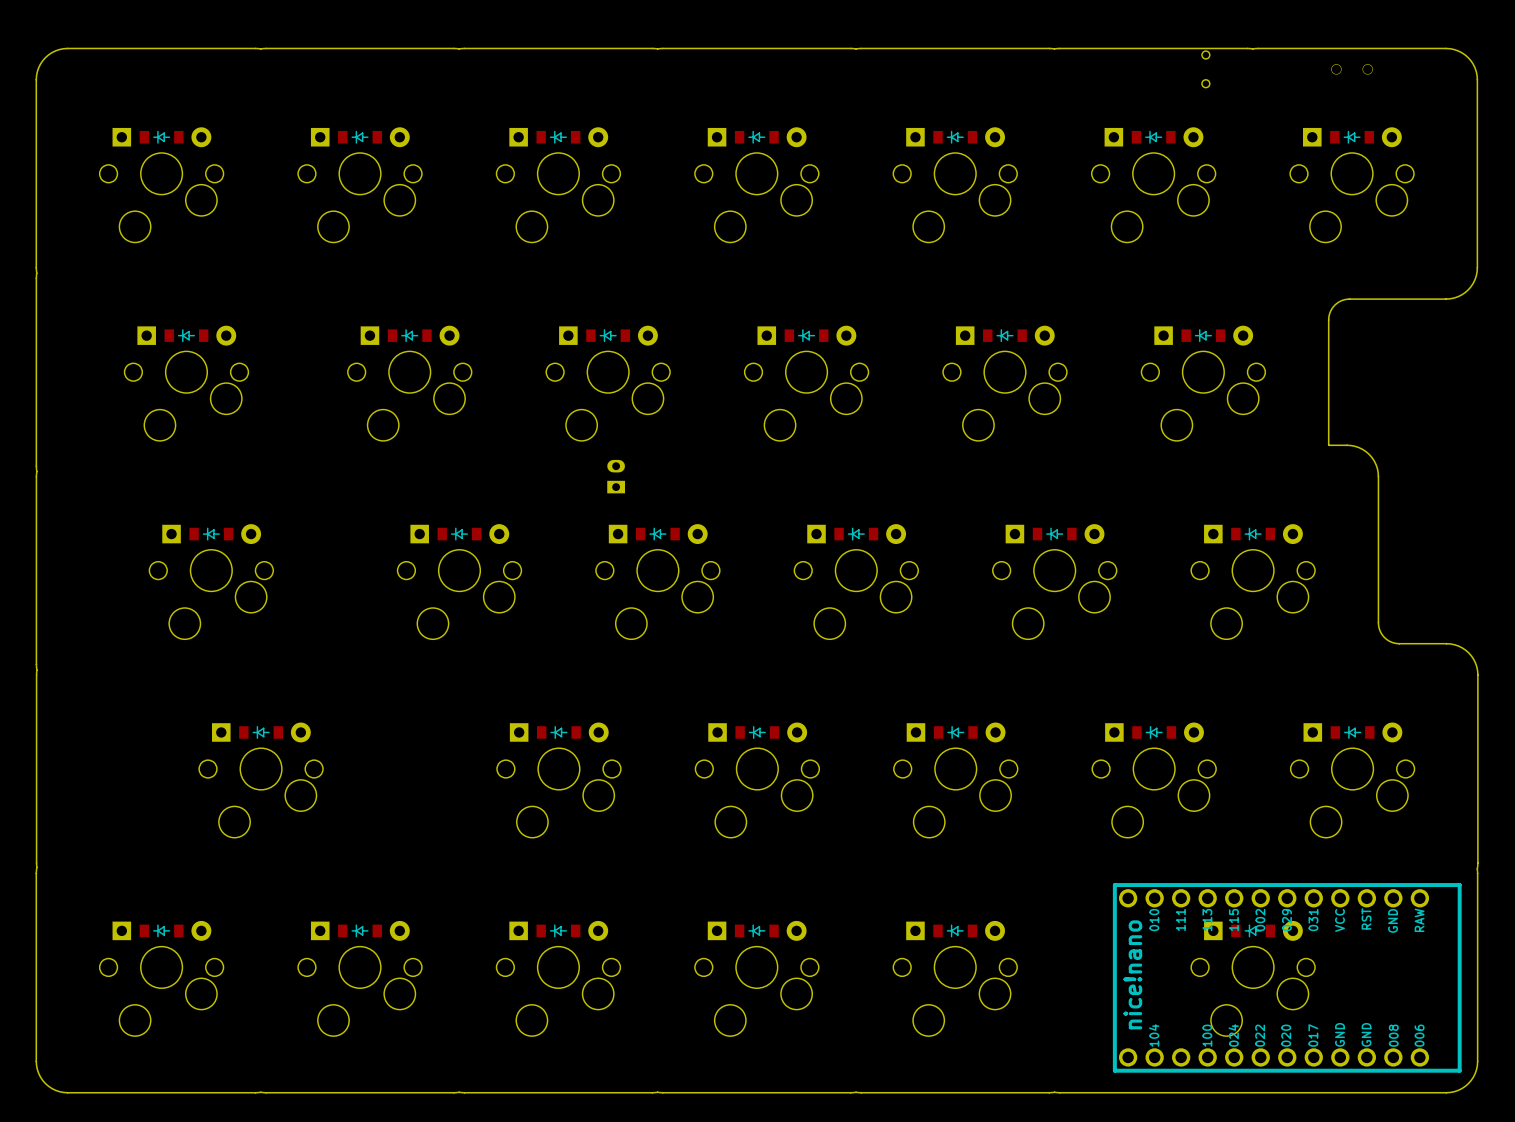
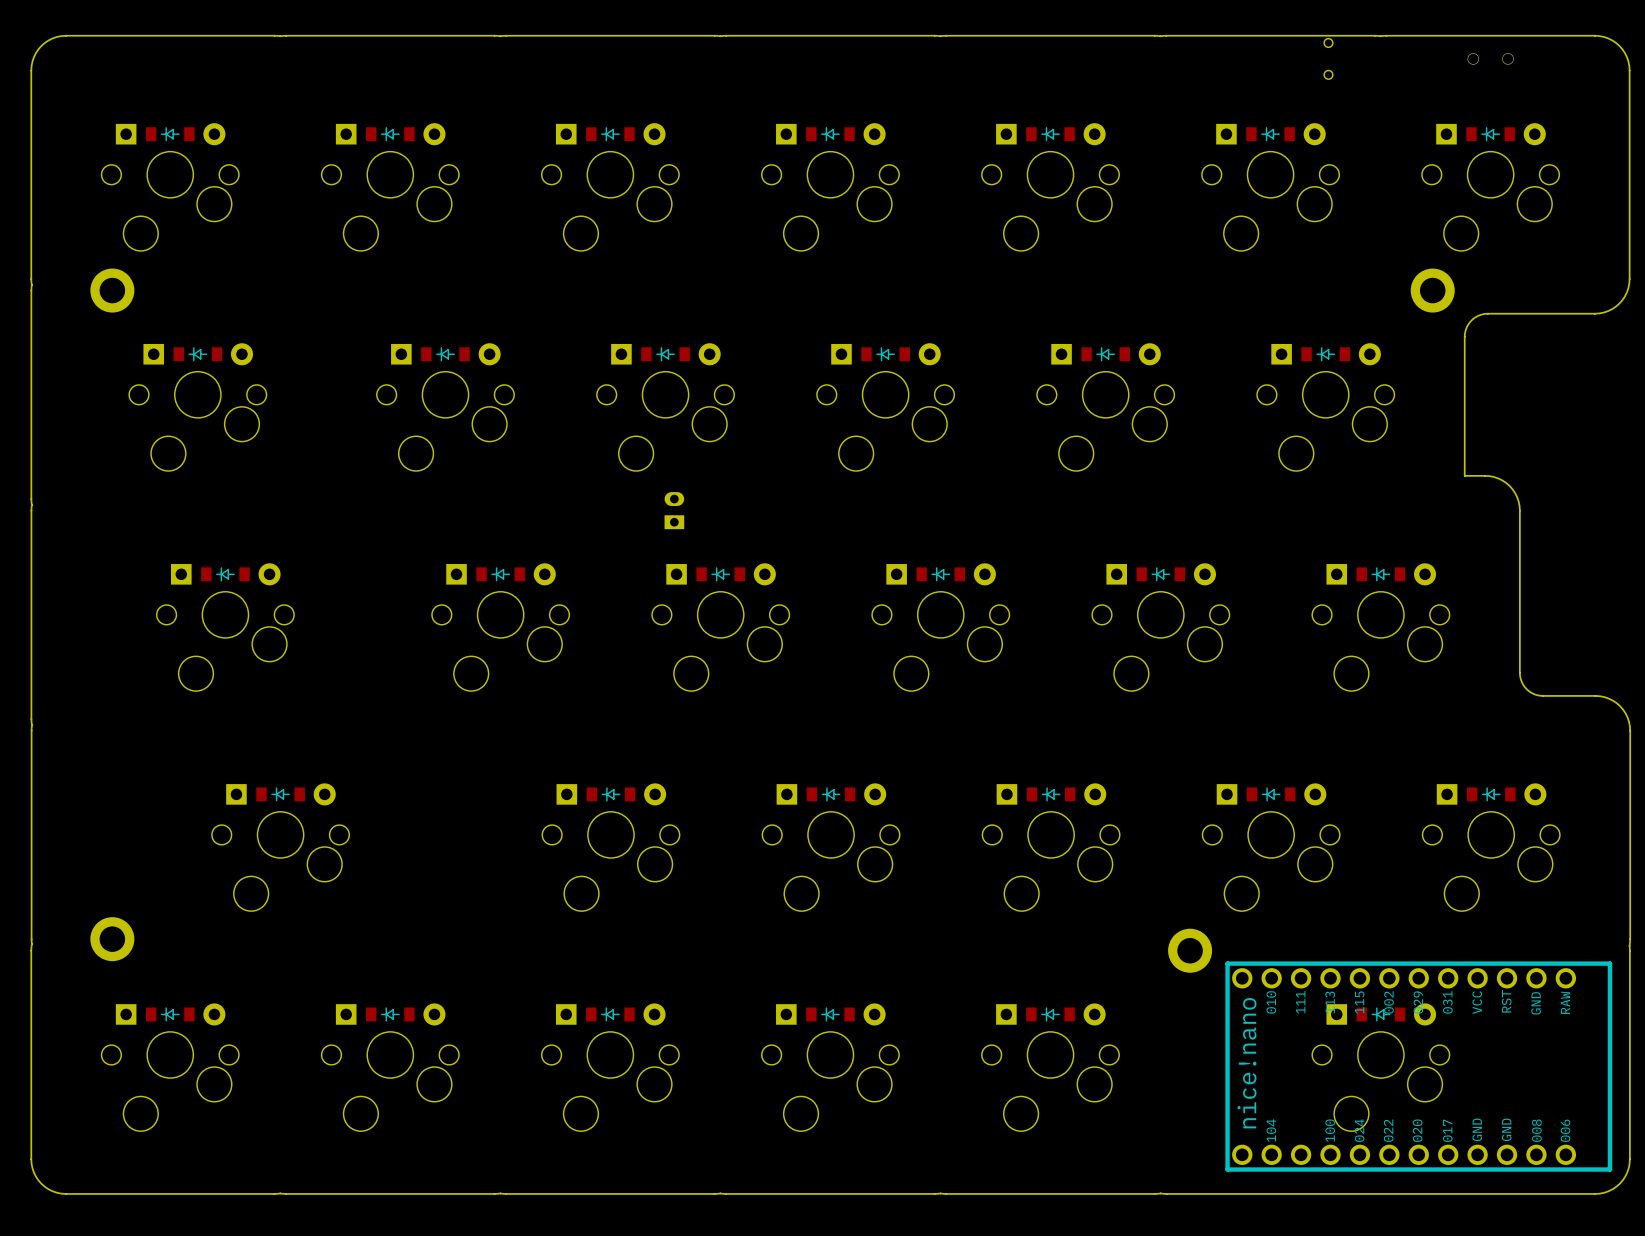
part: none -> (112, 290)
part: none -> (1432, 290)
part: none -> (112, 939)
part: none -> (1190, 950)

